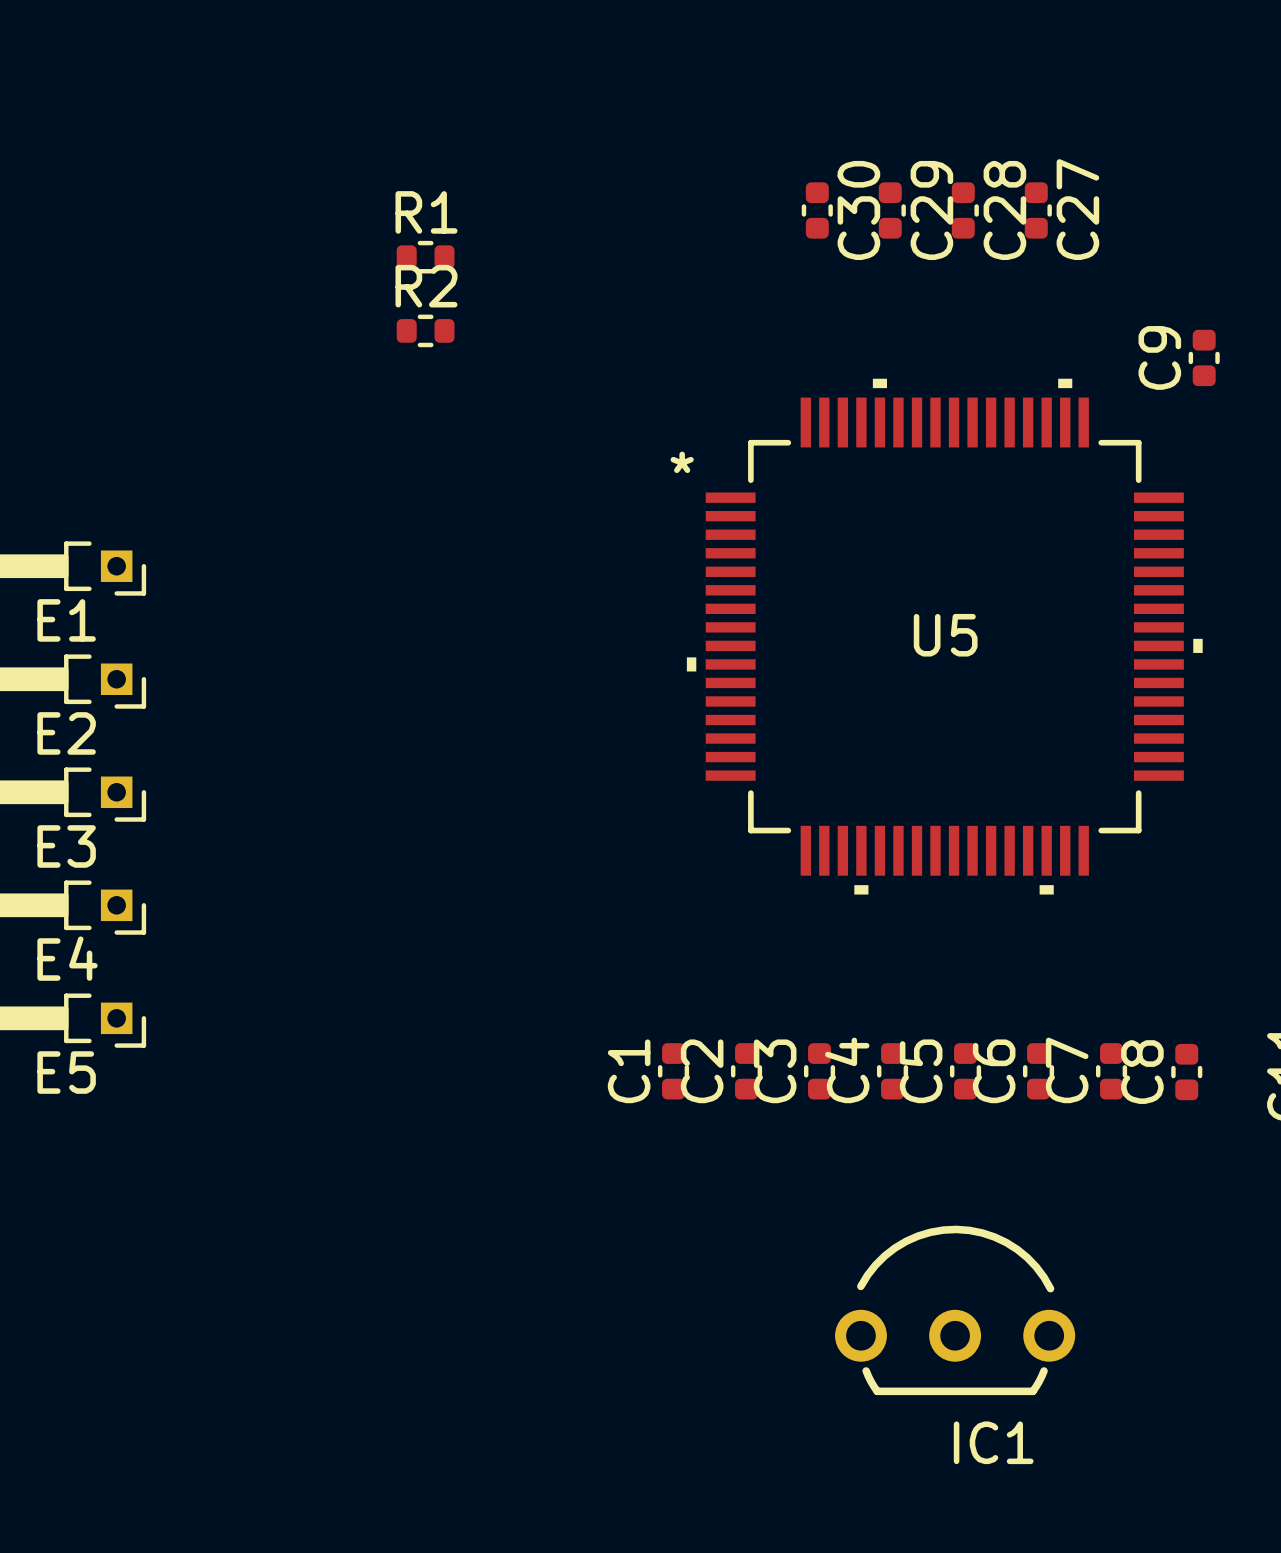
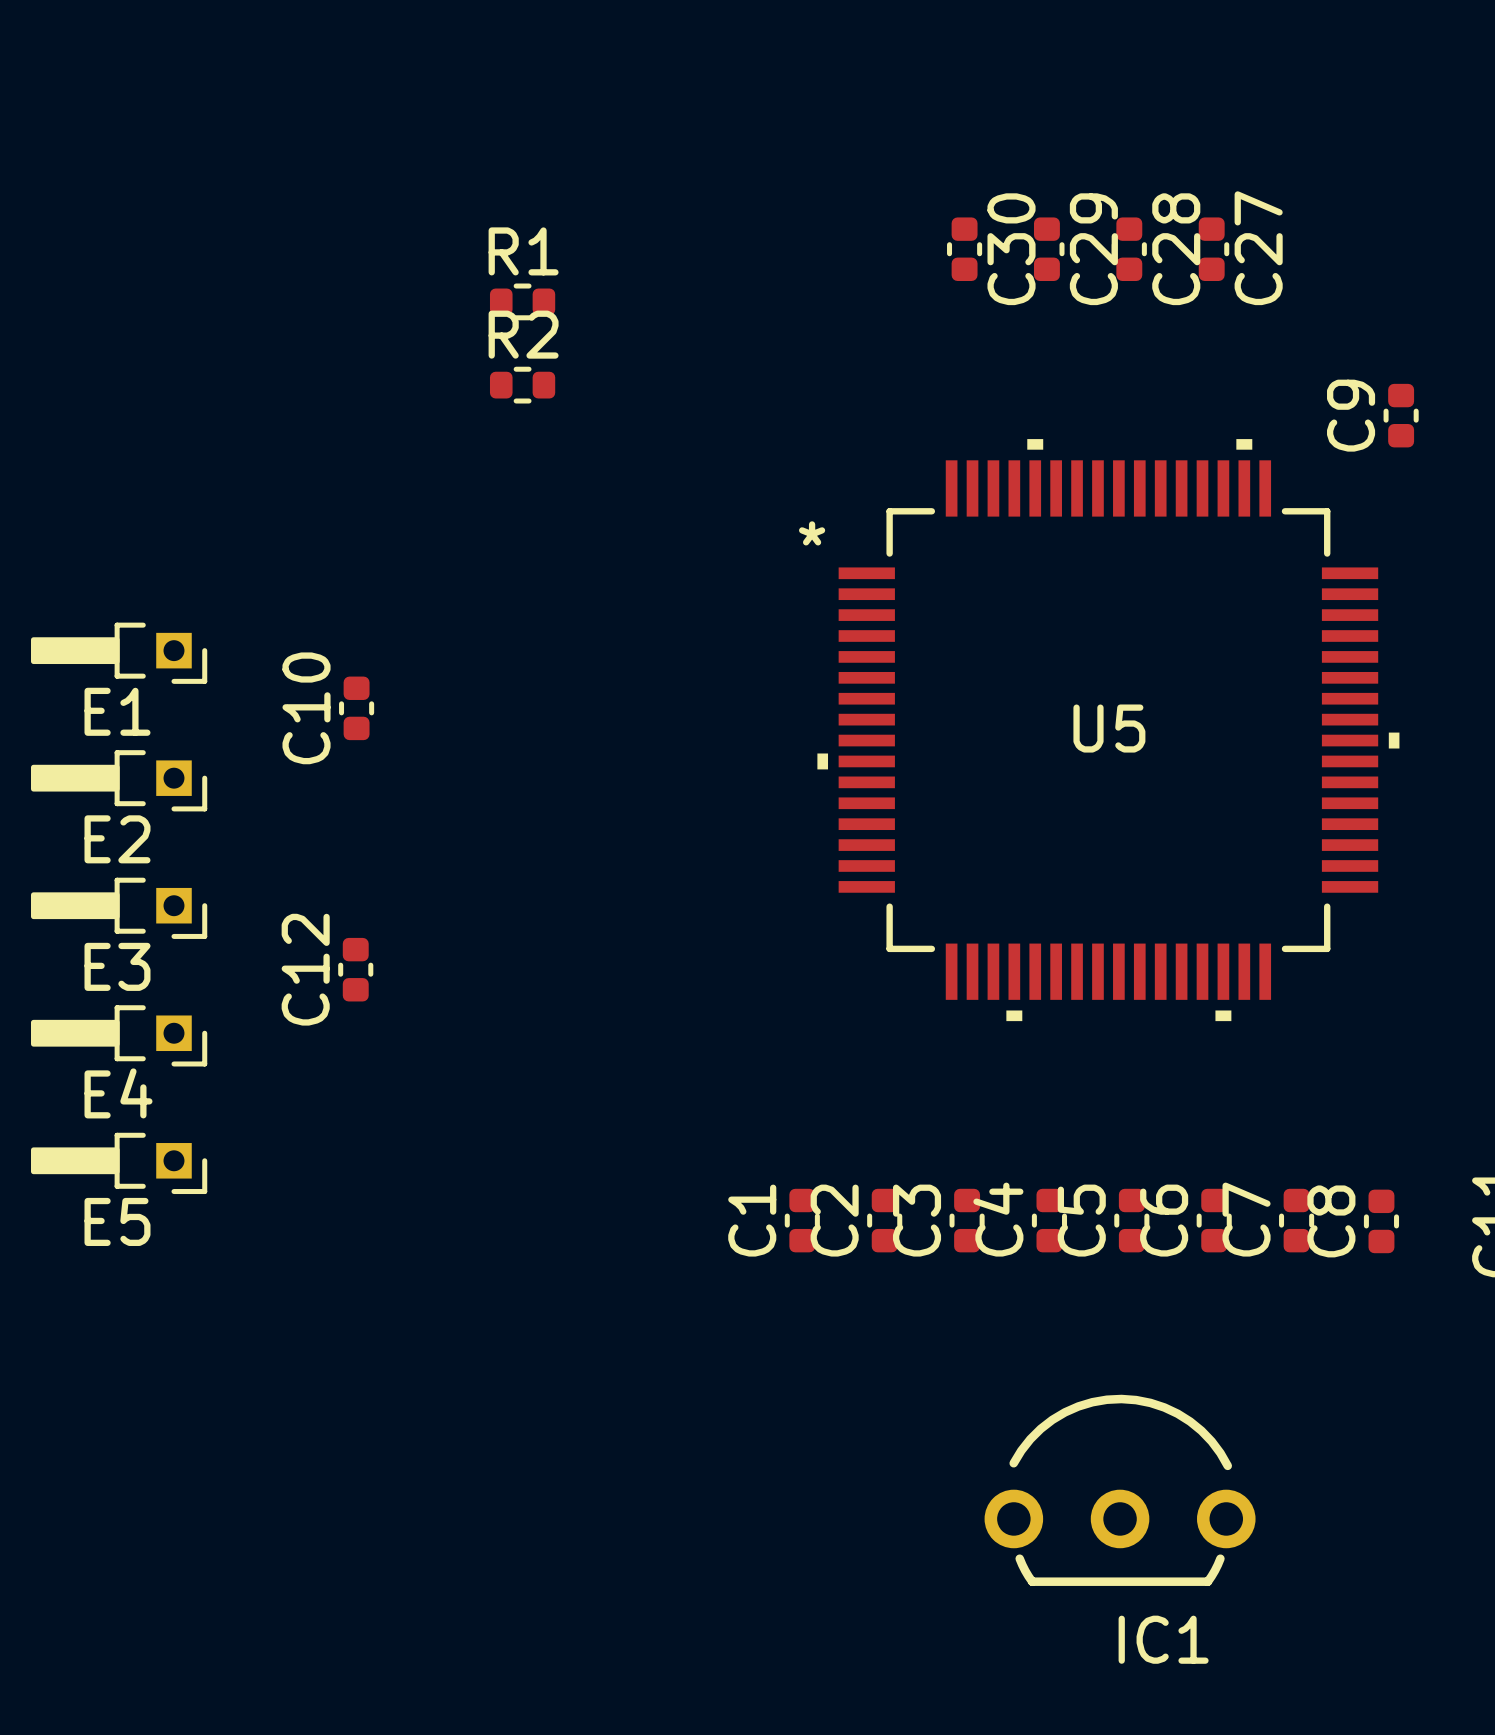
C10: none -> (356, 708)
C12: none -> (355, 969)

